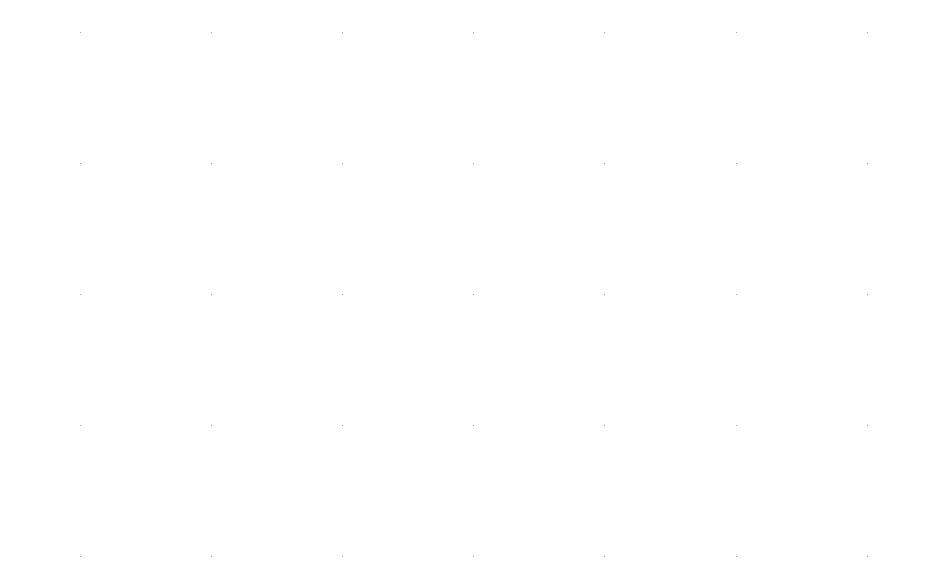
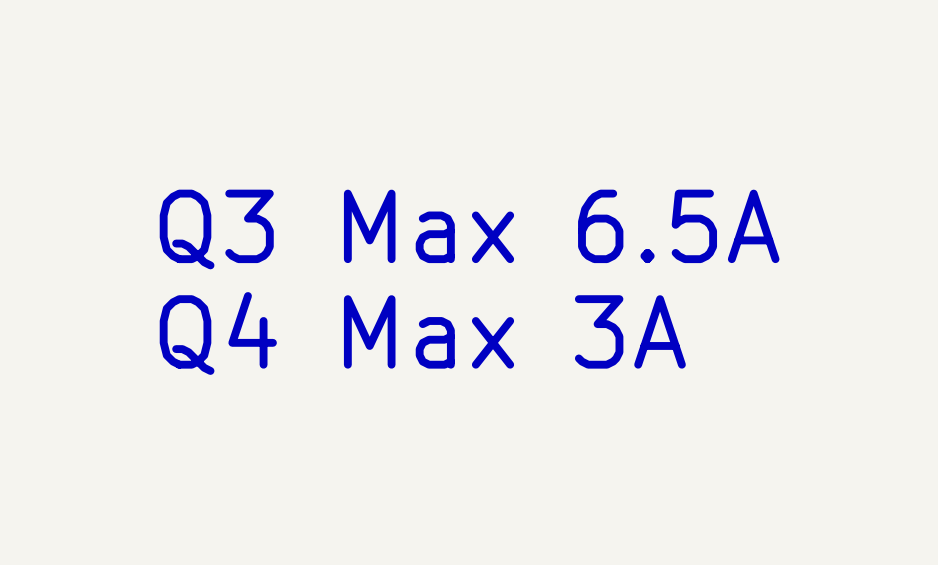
text: none -> Q3 Max 6.5A (469, 229)
text: none -> Q4 Max 3A (422, 333)

